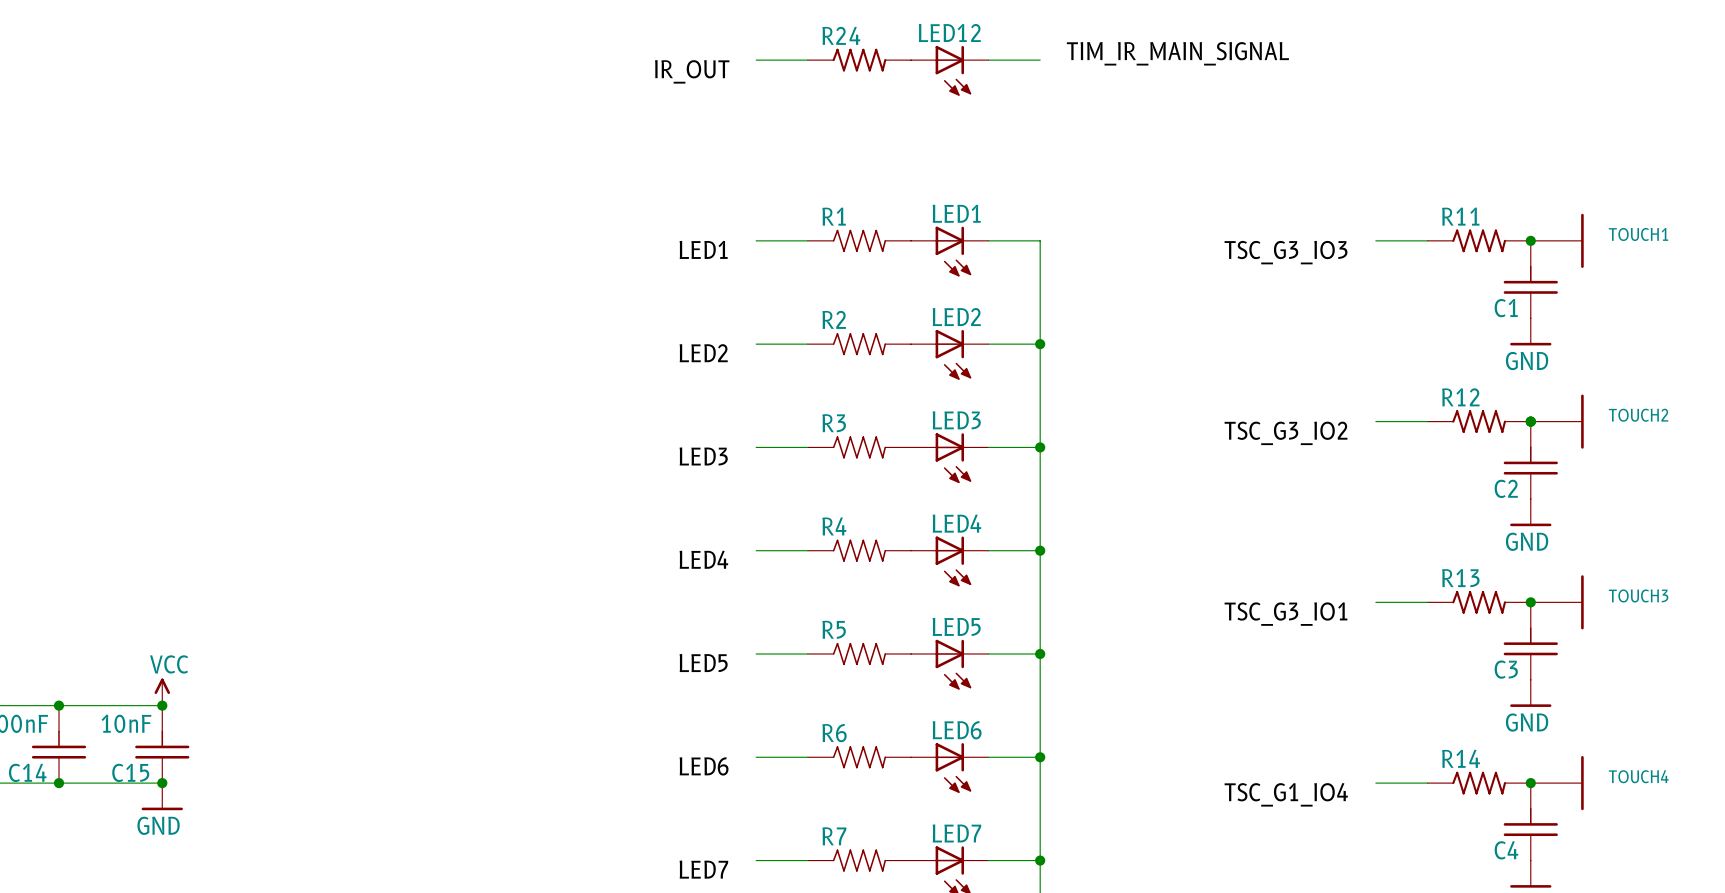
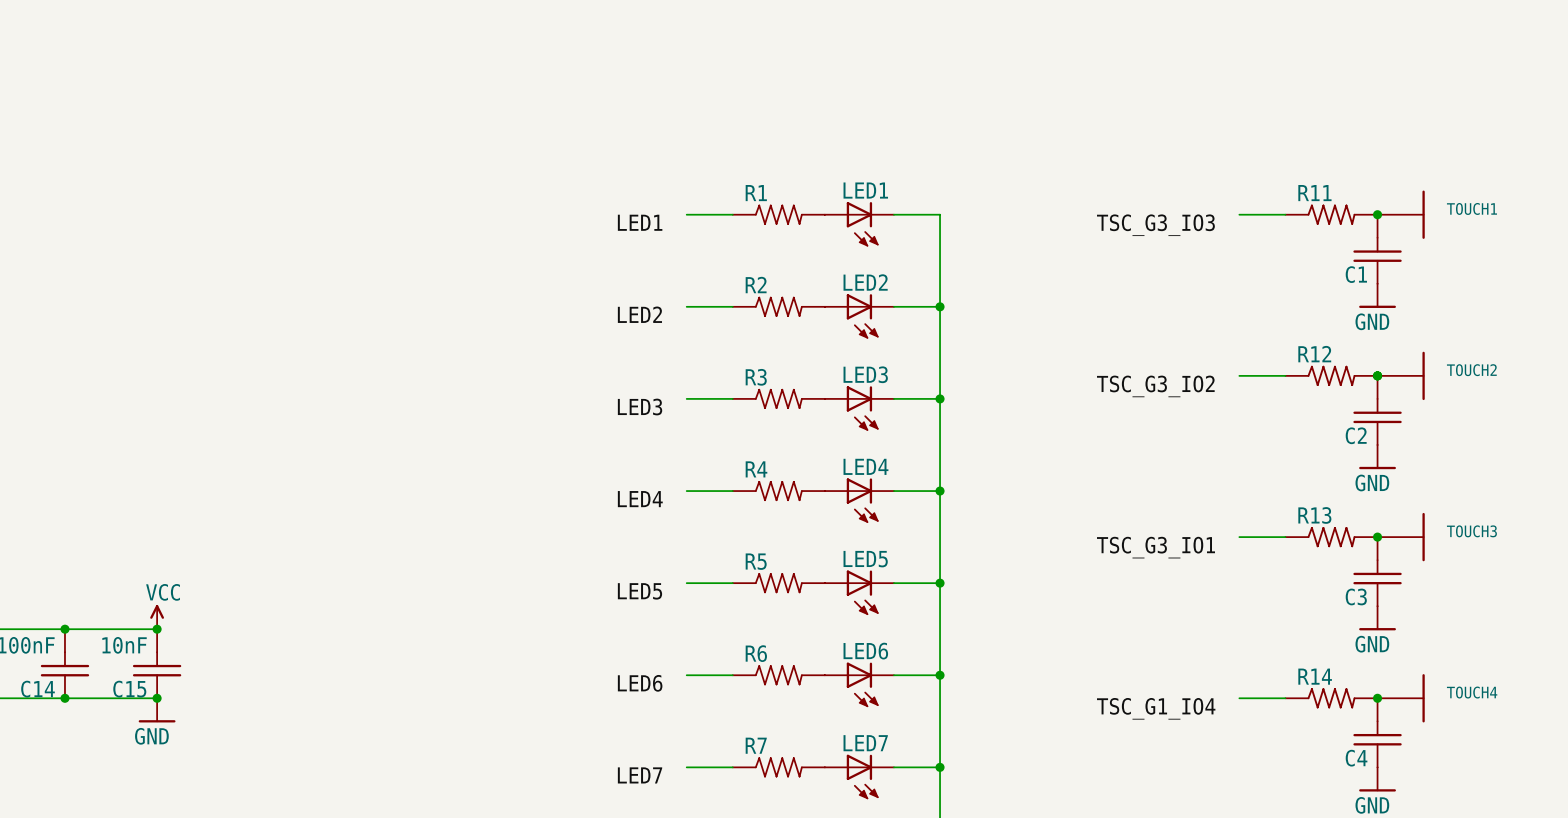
label: TIM_IR_MAIN_SIGNAL (1177, 53) -> none
wire: (756, 60) (807, 60) -> none
R24: (859, 60) -> none
wire: (988, 60) (1040, 60) -> none
LED12: (949, 70) -> none
label: IR_OUT (692, 71) -> none

